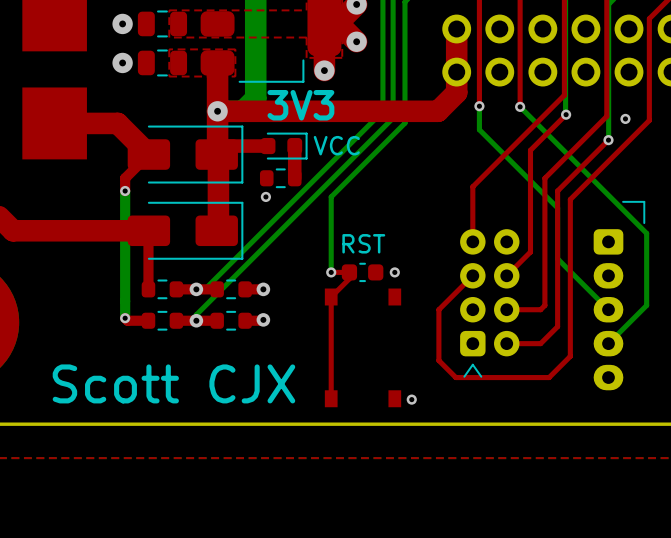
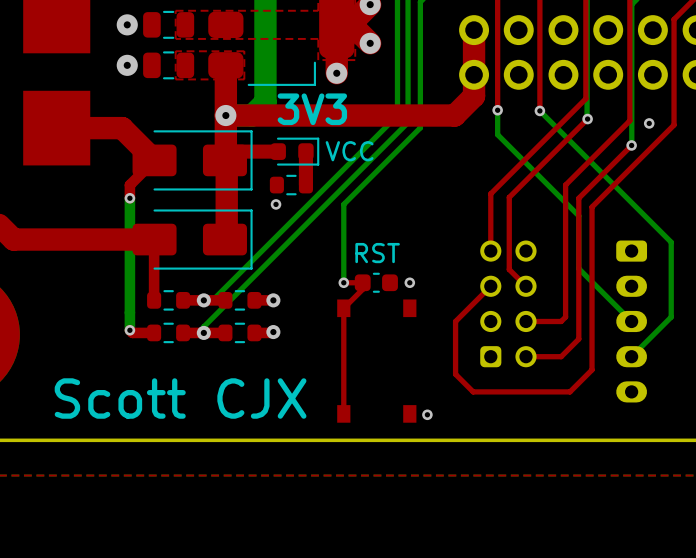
top track: (530, 150) (530, 252) (506, 275) -> (550, 156) (509, 197) (509, 269) (525, 286)
part footprint: [460, 229, 520, 378] -> [480, 240, 537, 368]
part: (619, 295) -> none
part: none -> (631, 321)

